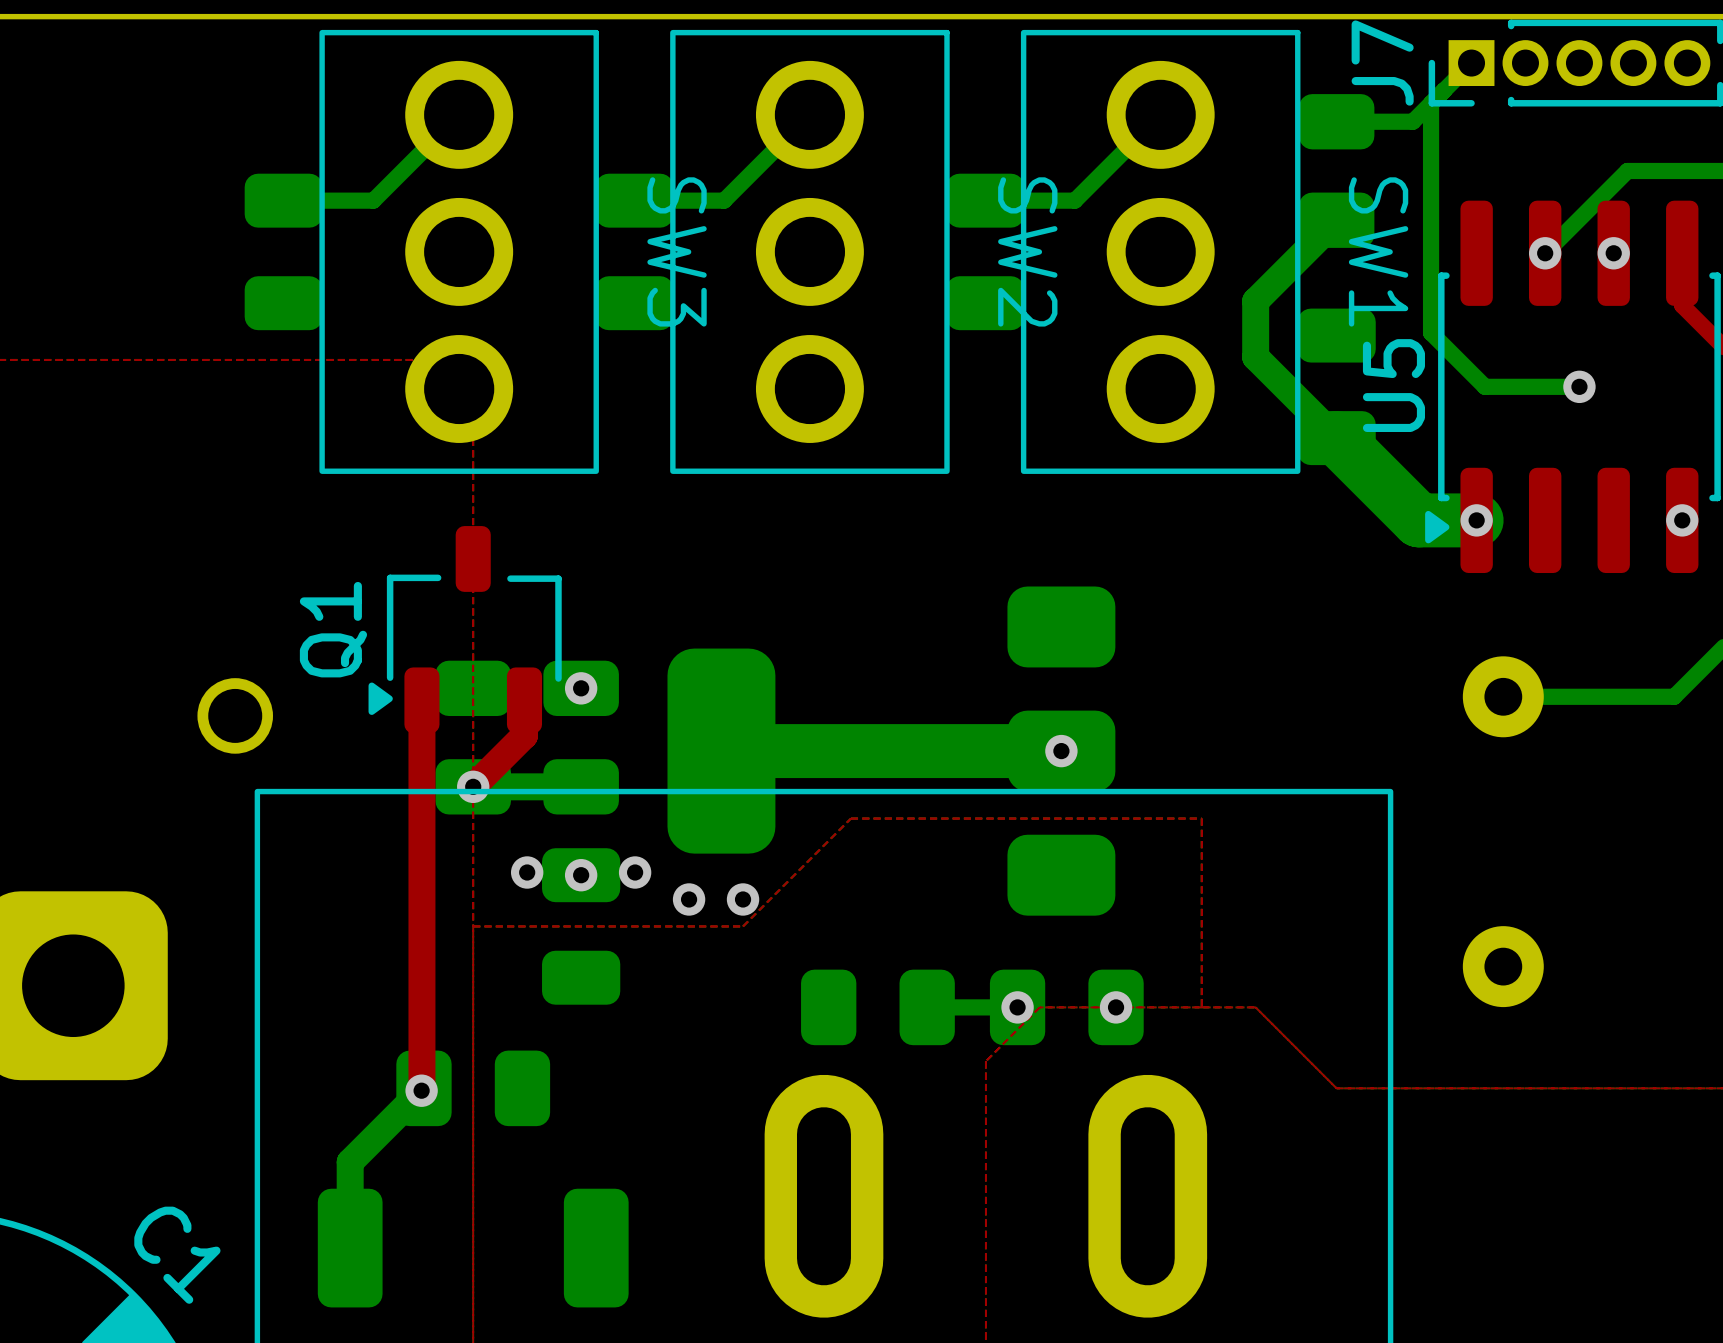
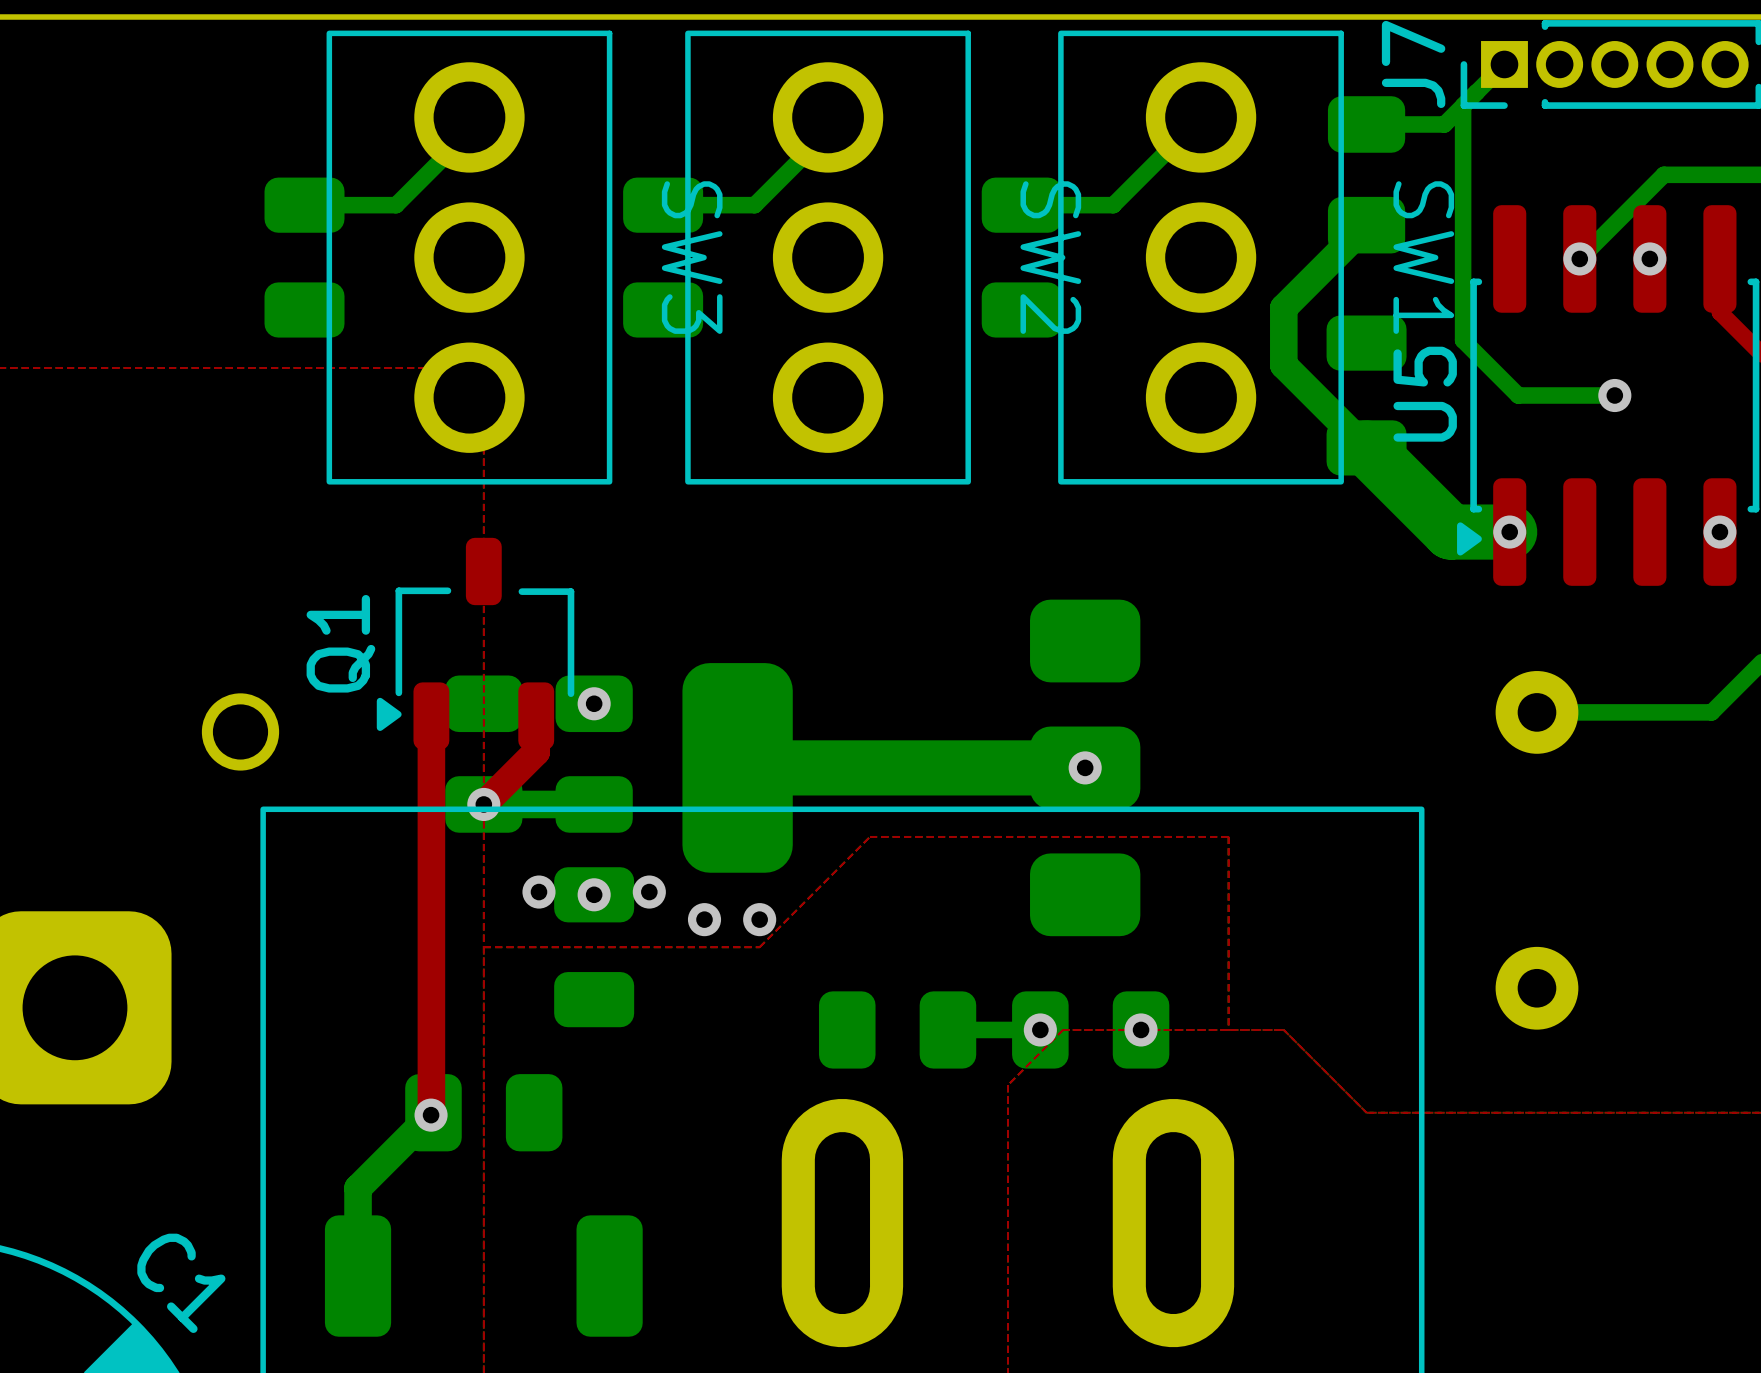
bottom track: (459, 114) (373, 200) -> (483, 117) (396, 205) (381, 205)
bottom track: (809, 114) (724, 200) -> (842, 117) (754, 205) (740, 205)
bottom track: (1160, 114) (1074, 200) -> (1201, 117) (1113, 205) (1098, 205)
part position: (283, 251) -> (304, 257)
part position: (634, 251) -> (663, 257)
part position: (985, 251) -> (1021, 257)
SW1 position: (1160, 251) -> (1201, 257)

